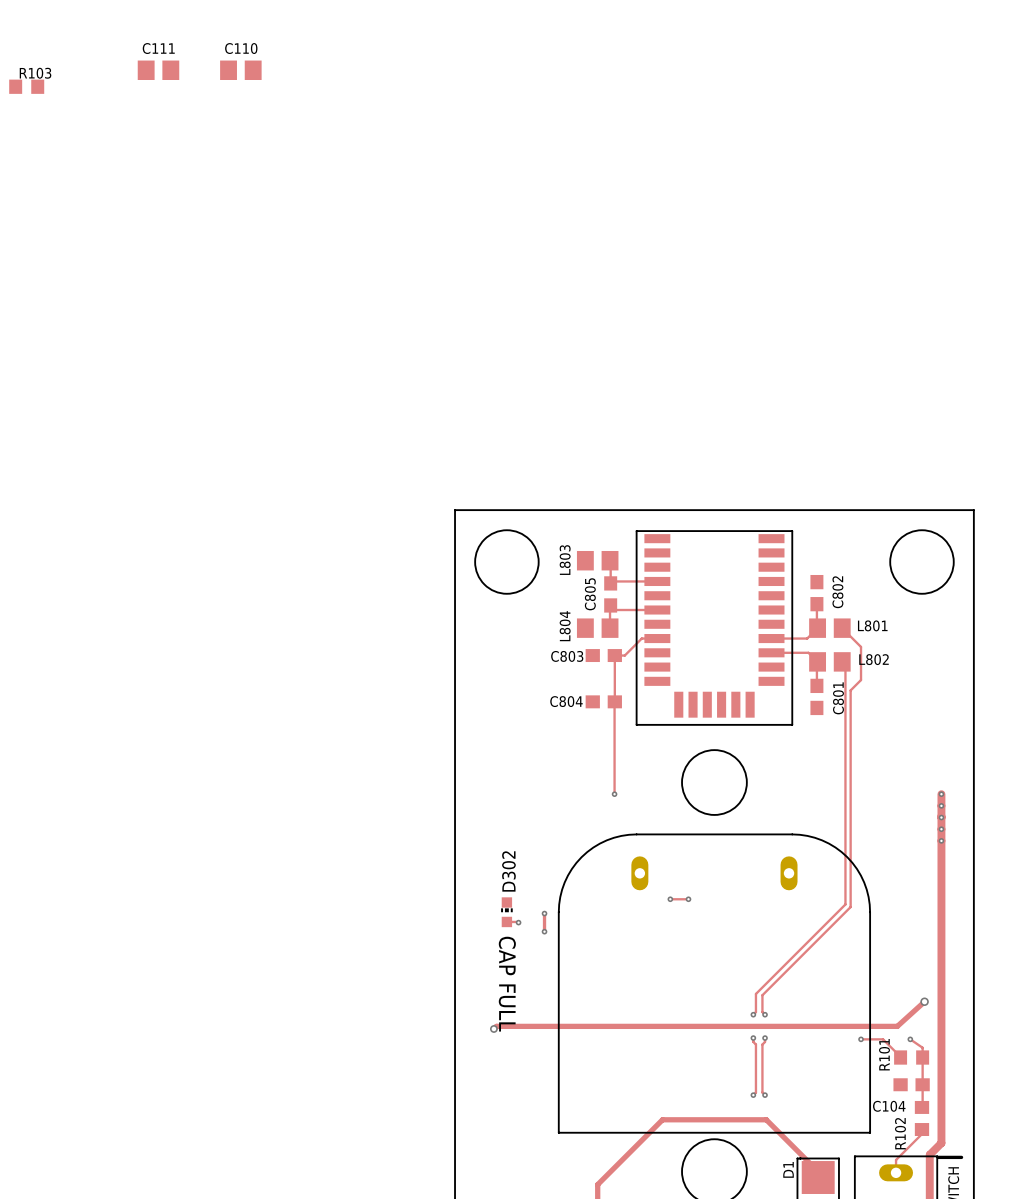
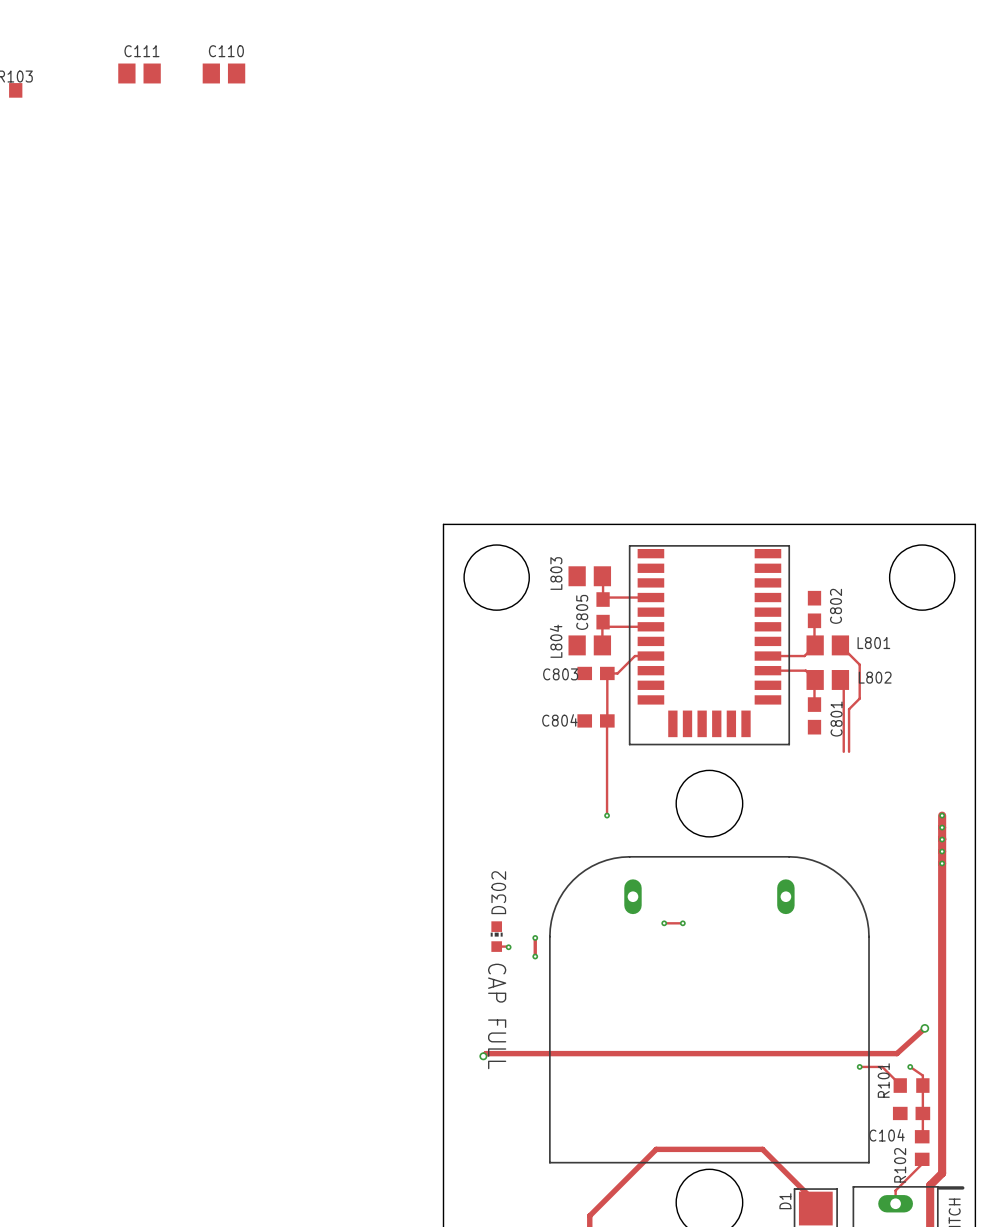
track: (845, 731) (845, 904) (755, 993) (755, 1012) (753, 1014) -> none
track: (850, 731) (850, 907) (762, 995) (762, 1012) (765, 1014) -> none
via: (753, 1014) -> none
via: (765, 1014) -> none
track: (753, 1038) (755, 1044) (755, 1092) (753, 1095) -> none
via: (753, 1038) -> none
track: (765, 1038) (762, 1044) (762, 1092) (765, 1095) -> none
via: (765, 1038) -> none
via: (753, 1095) -> none
via: (765, 1095) -> none

